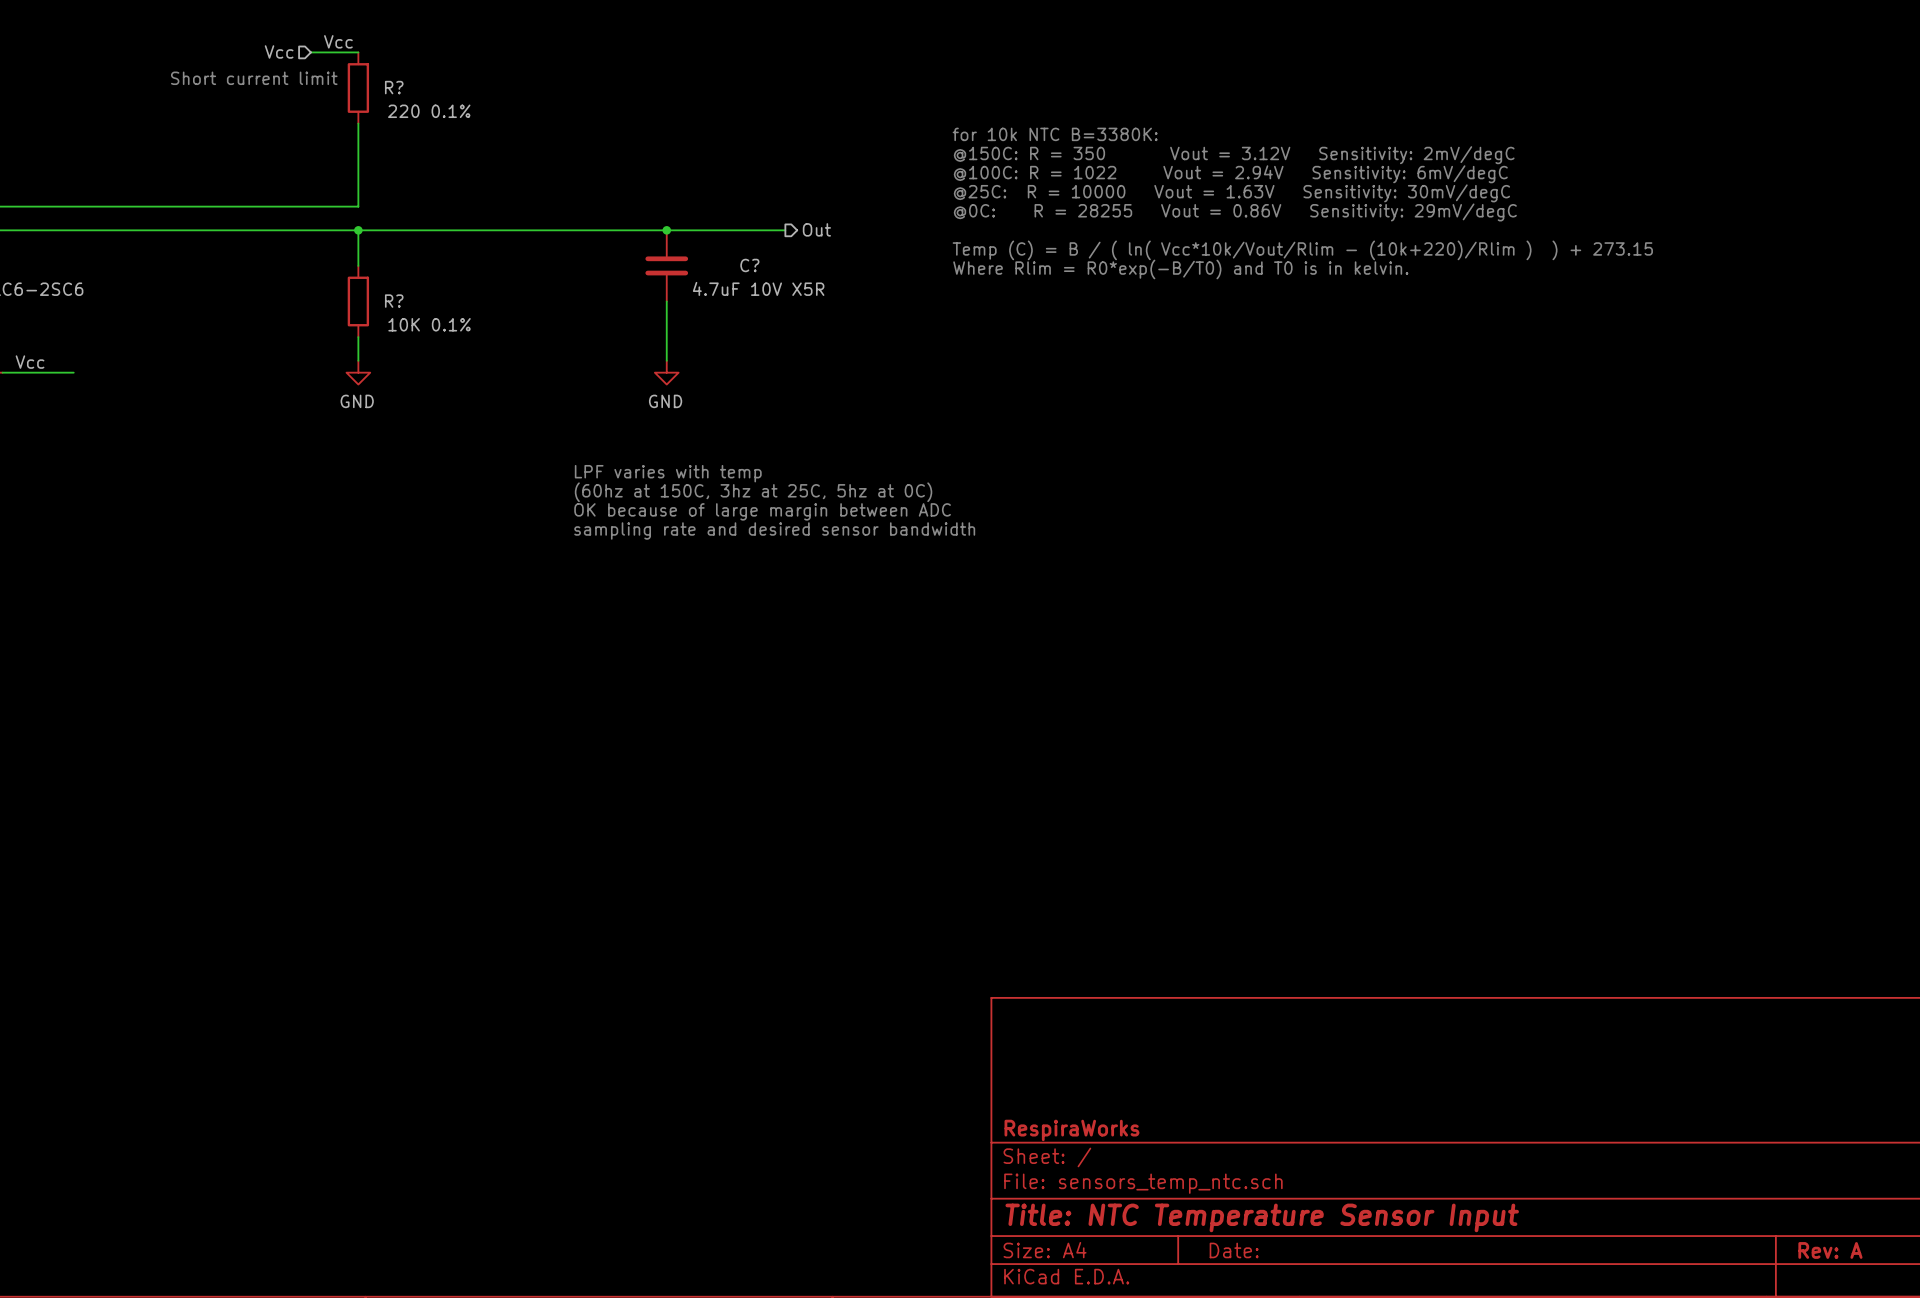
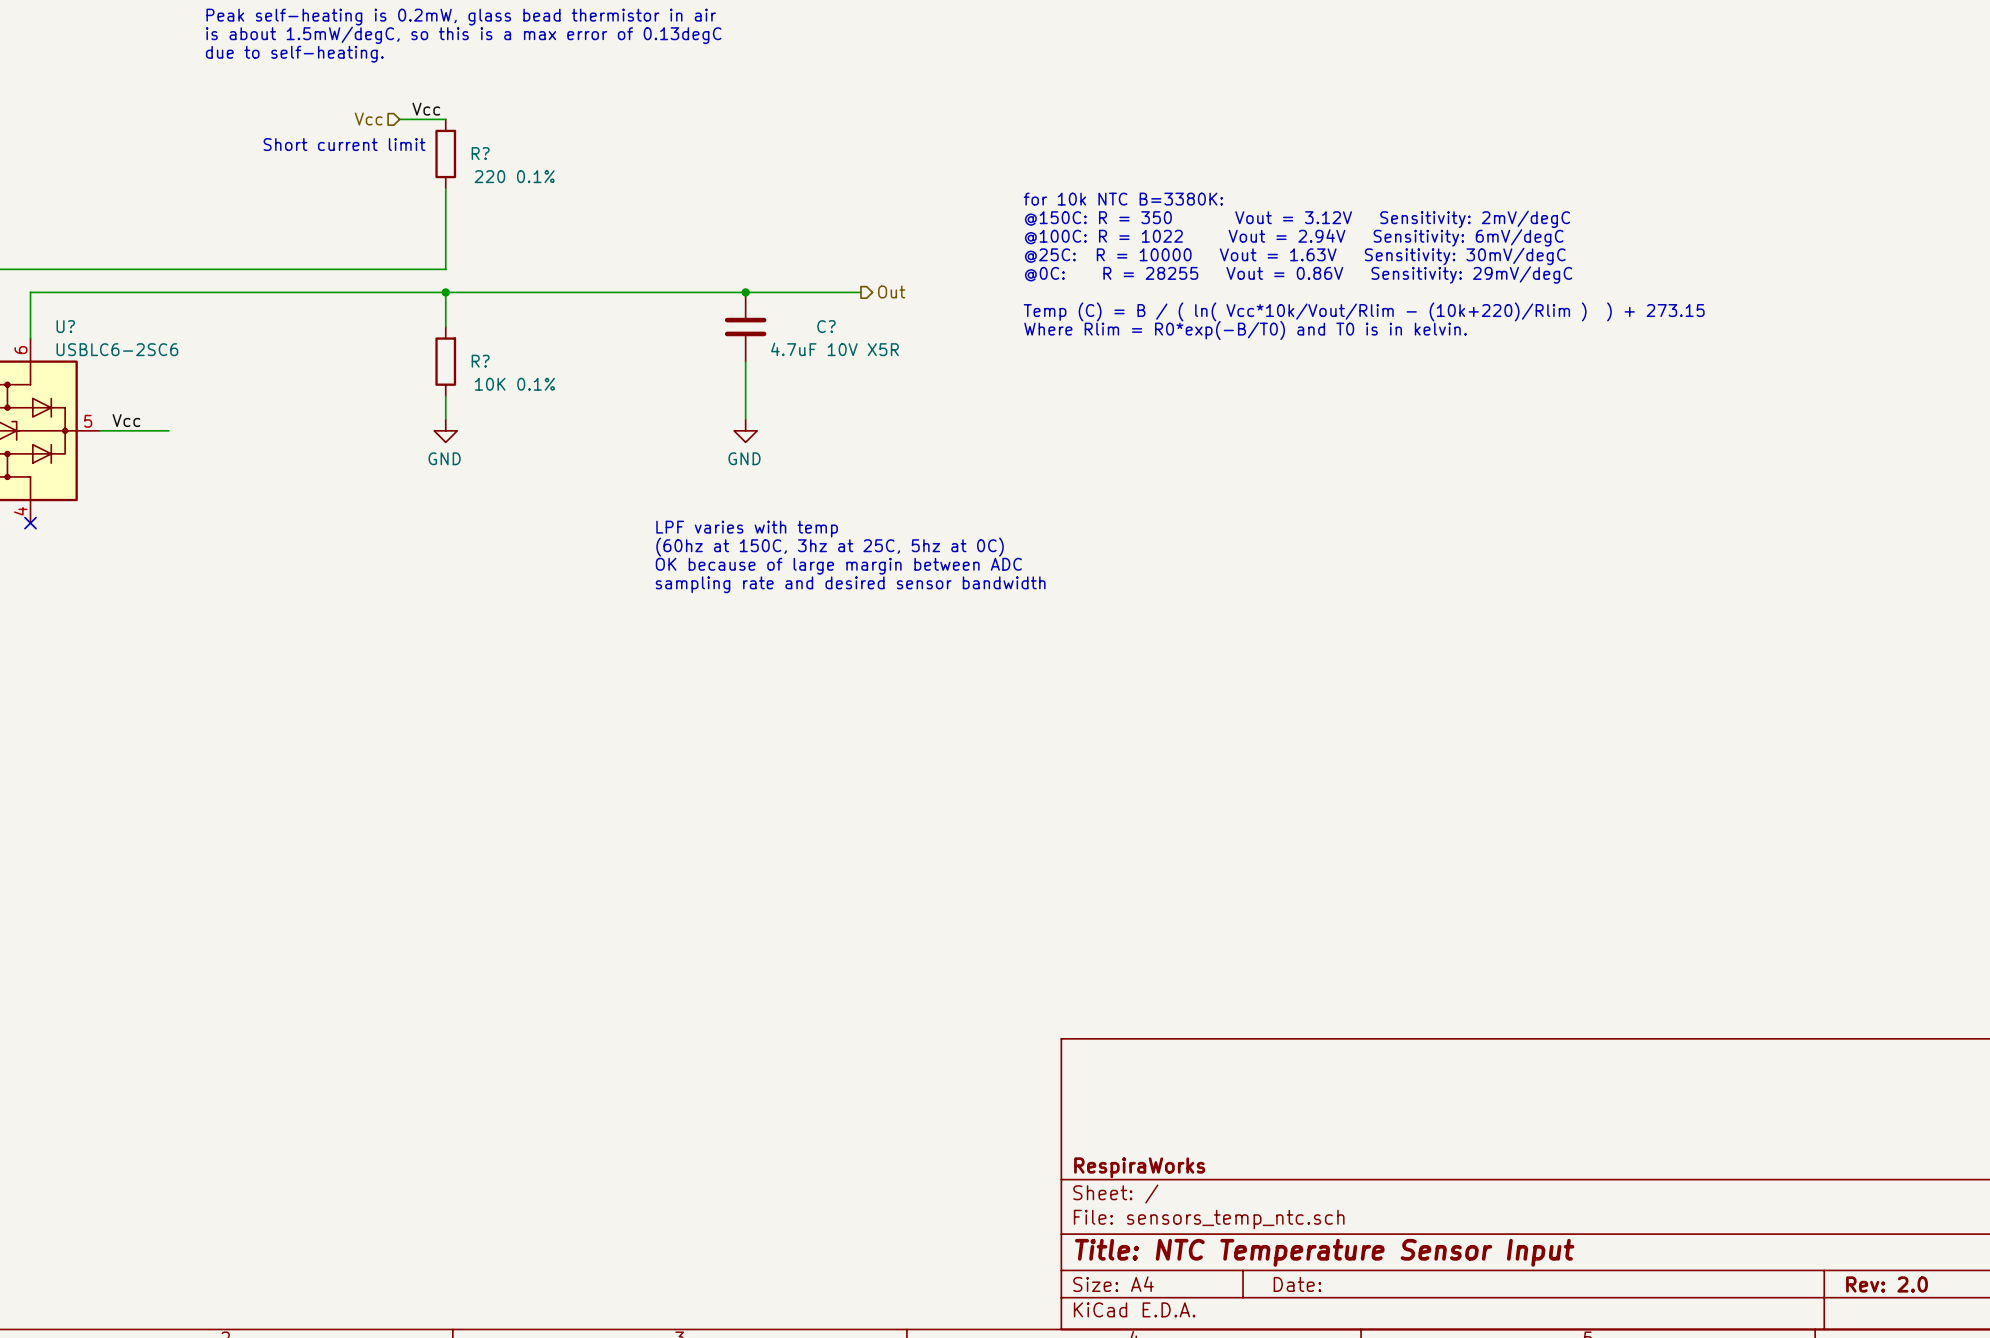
title block: Rev: A (1830, 1250) -> Rev: 2.0 (1887, 1284)

